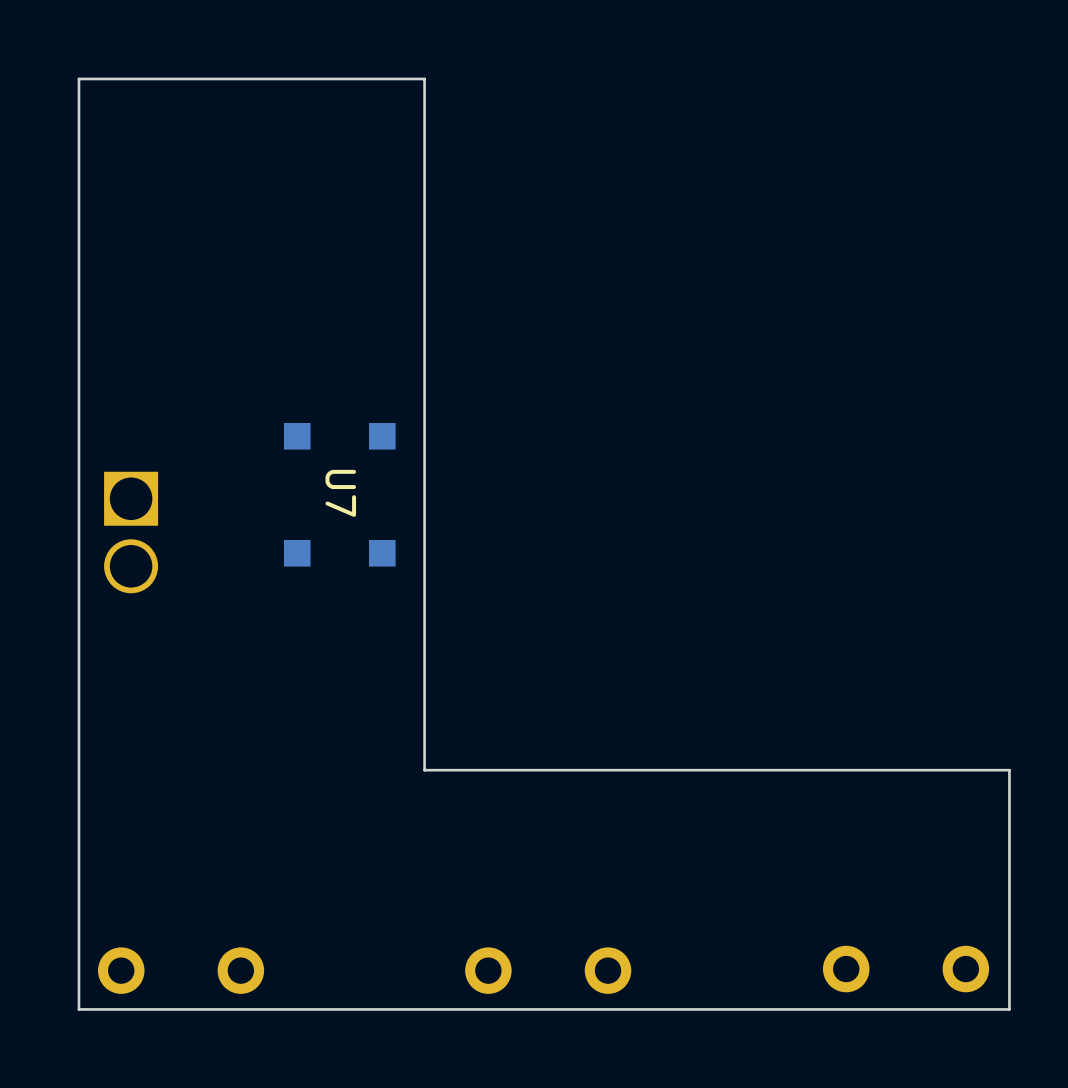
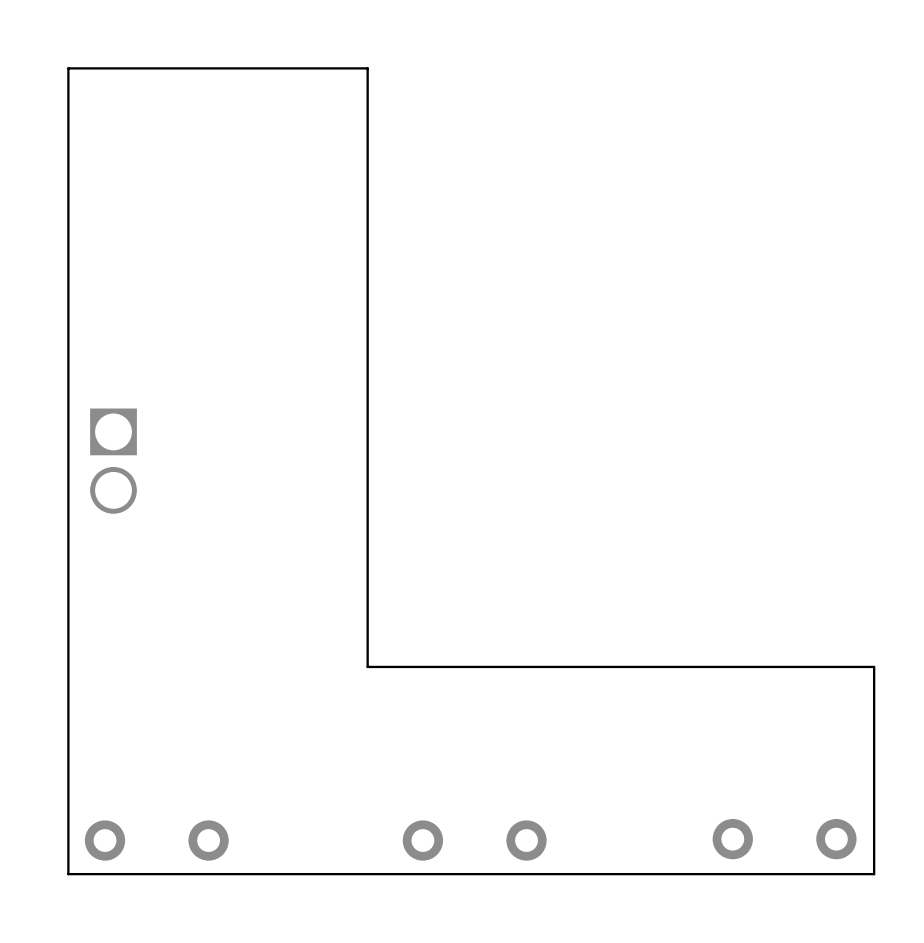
U7: (339, 494) -> none

